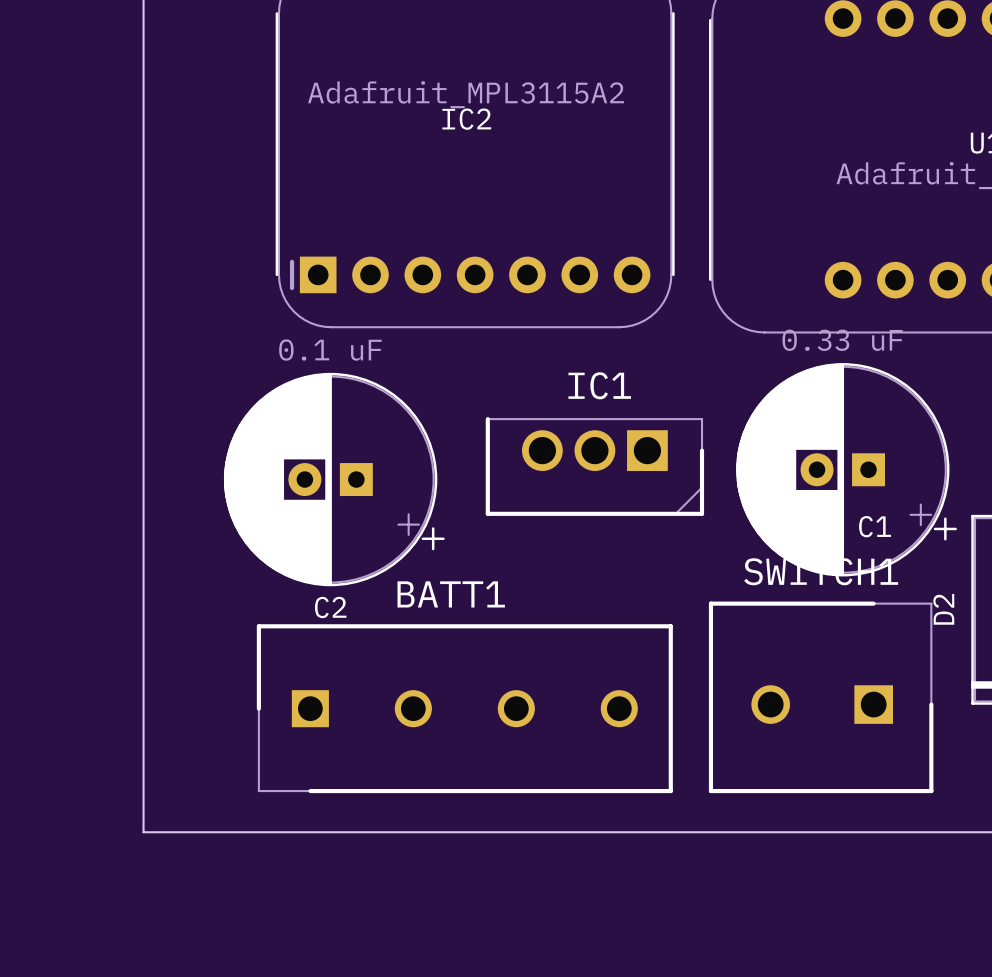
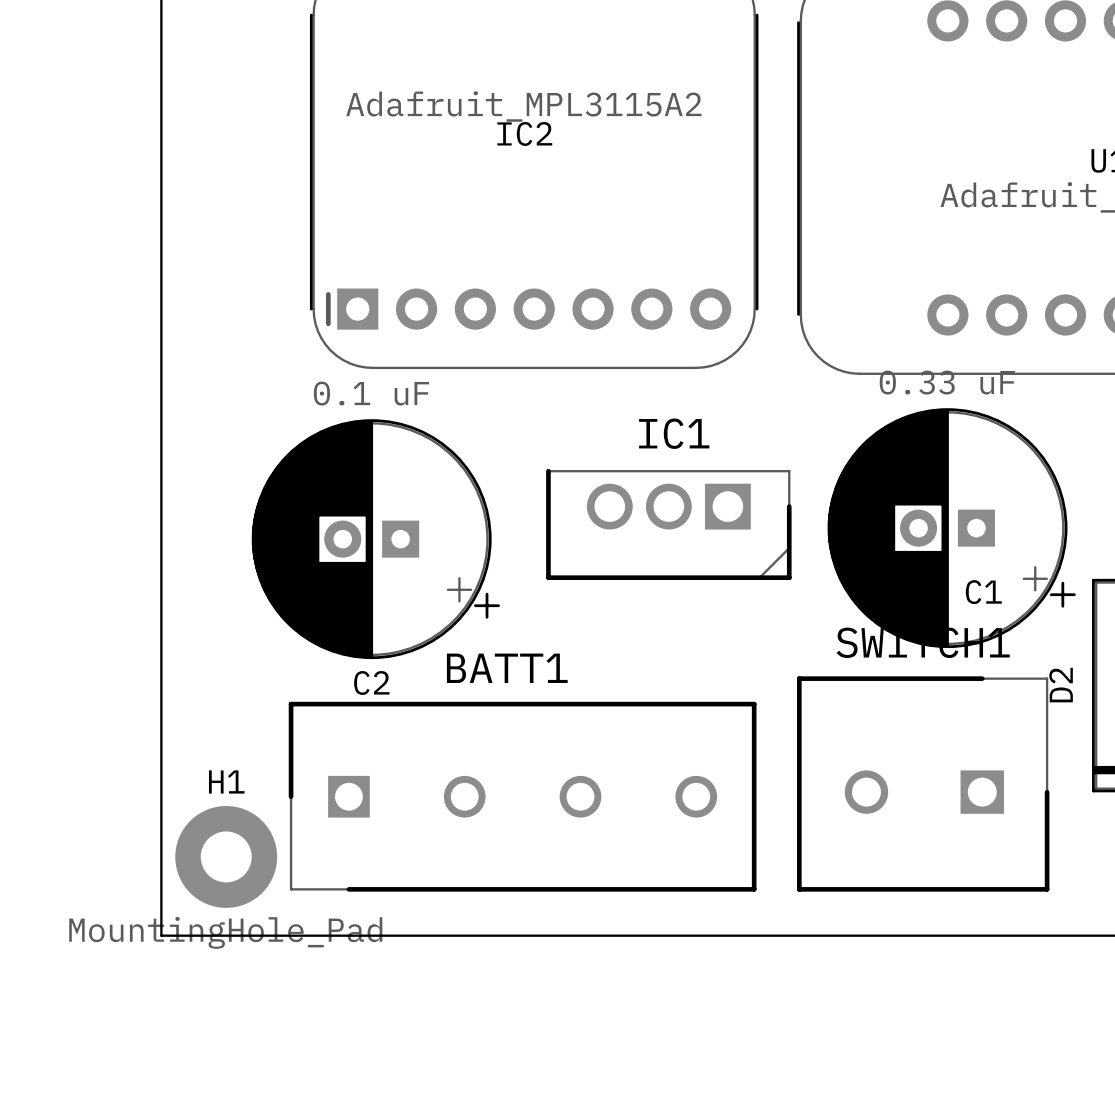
H1: none -> MountingHole_Pad (226, 856)

